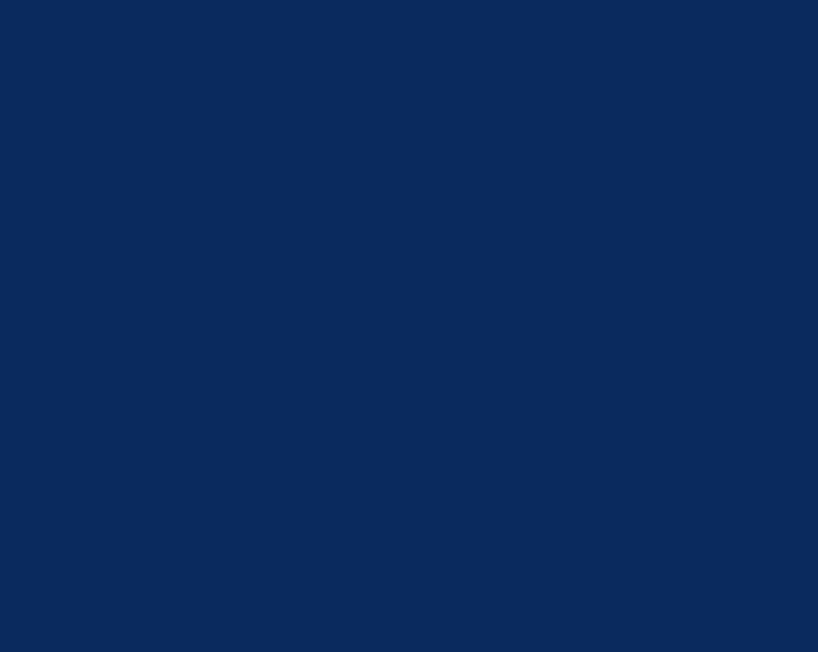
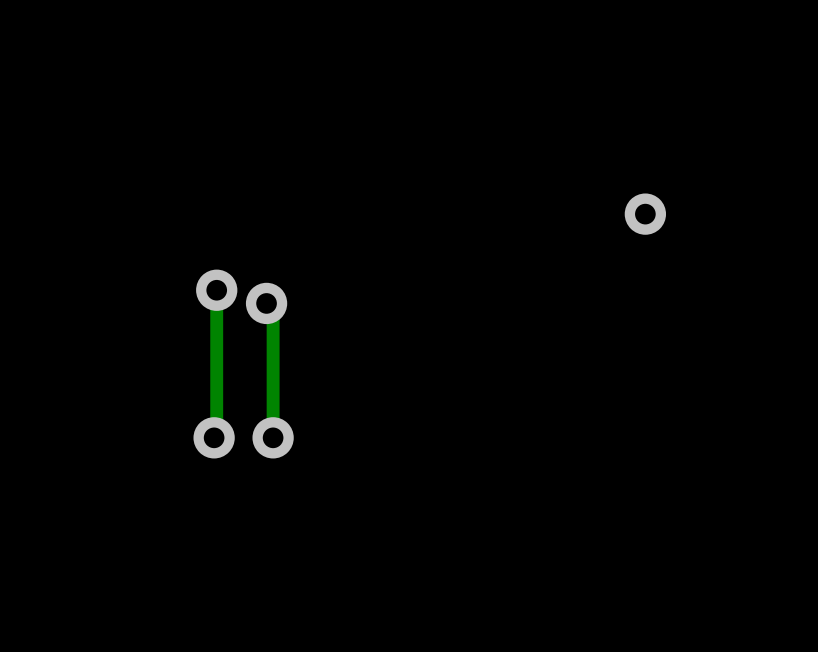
via: none -> (645, 214)
track: none -> (216, 290) (216, 435) (214, 437)
via: none -> (216, 290)
track: none -> (266, 303) (273, 310) (273, 437)
via: none -> (266, 303)
via: none -> (214, 437)
via: none -> (273, 437)

